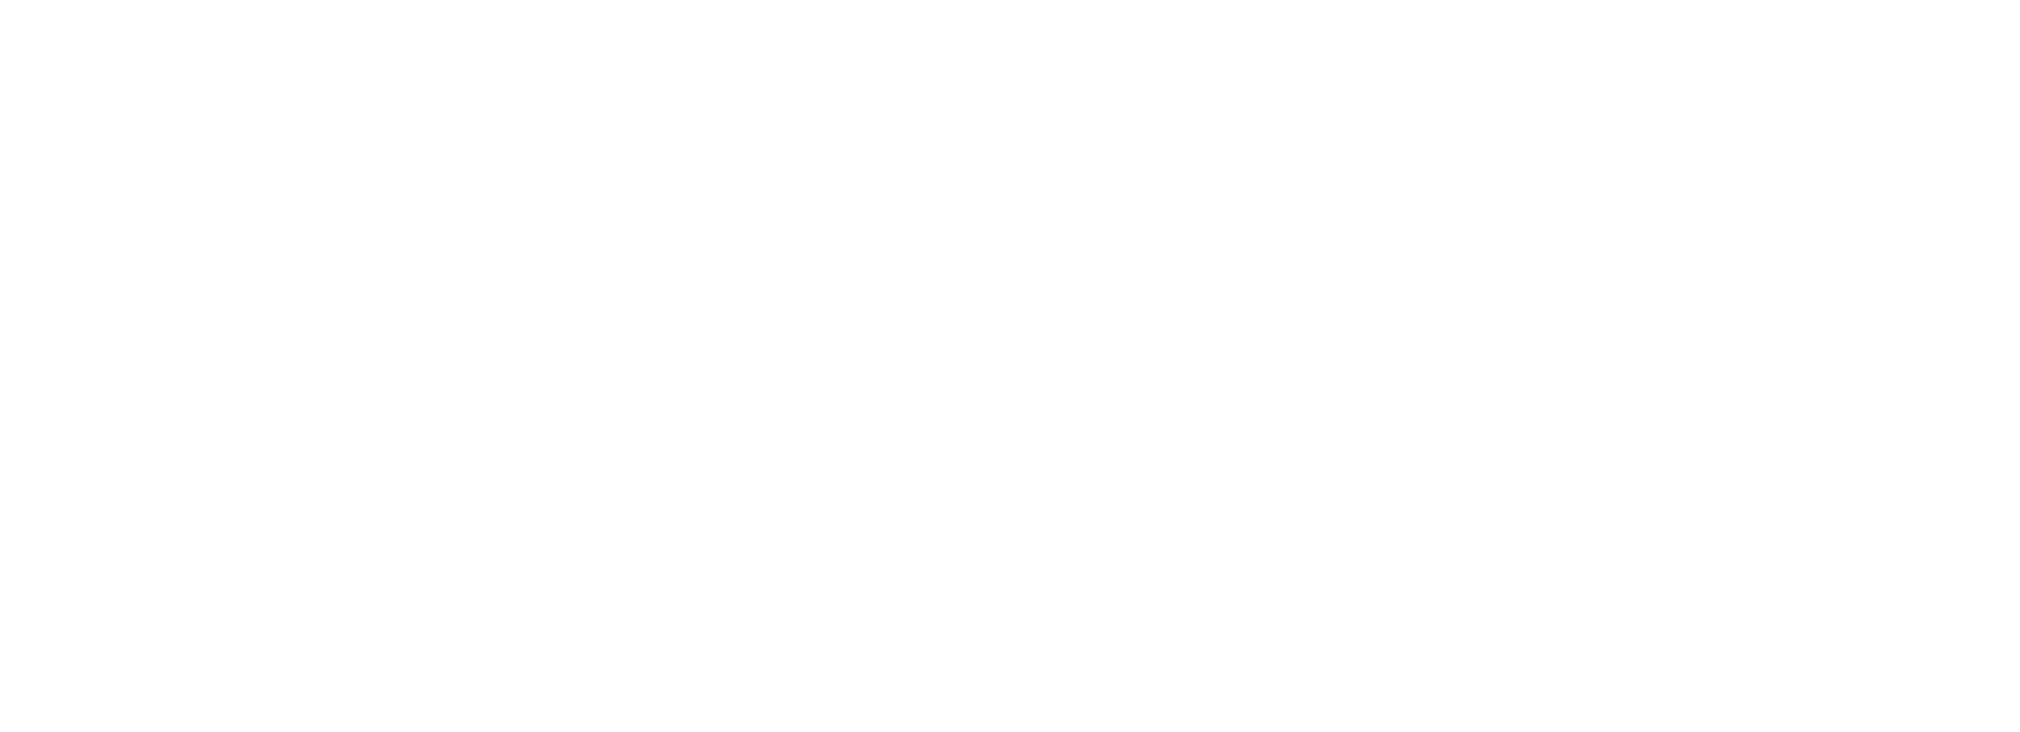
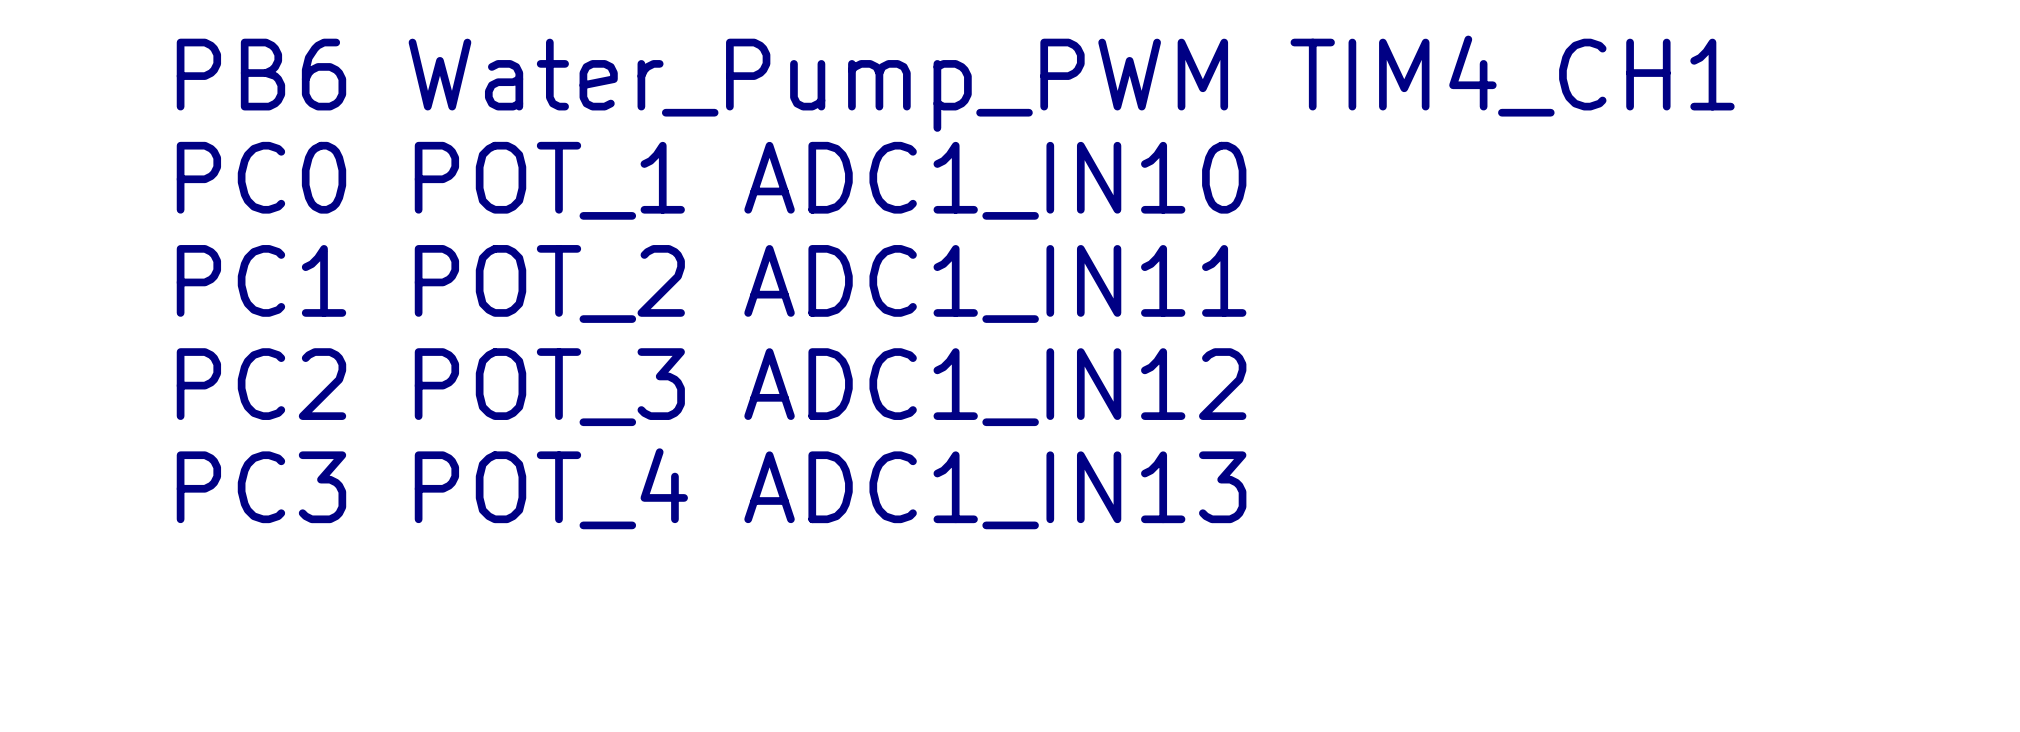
text: none -> PB6 Water_Pump_PWM TIM4_CH1 (955, 83)
text: none -> PC0 POT_1 ADC1_IN10 (711, 180)
text: none -> PC1 POT_2 ADC1_IN11 (711, 283)
text: none -> PC2 POT_3 ADC1_IN12 (711, 387)
text: none -> PC3 POT_4 ADC1_IN13 (711, 488)

